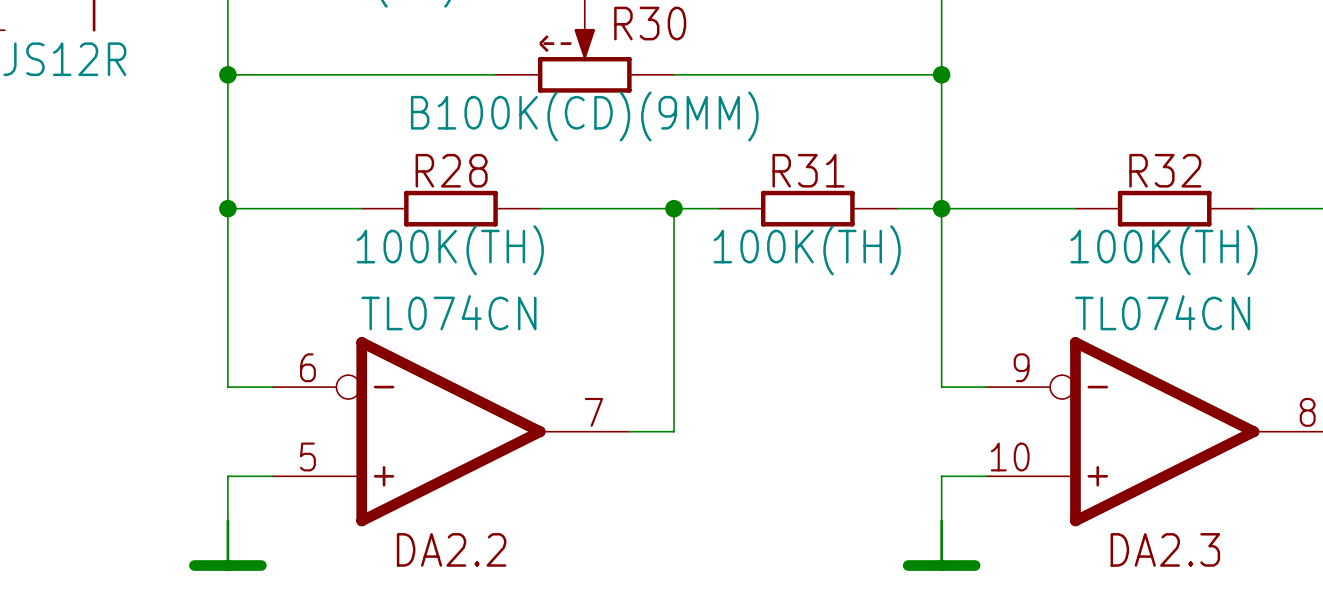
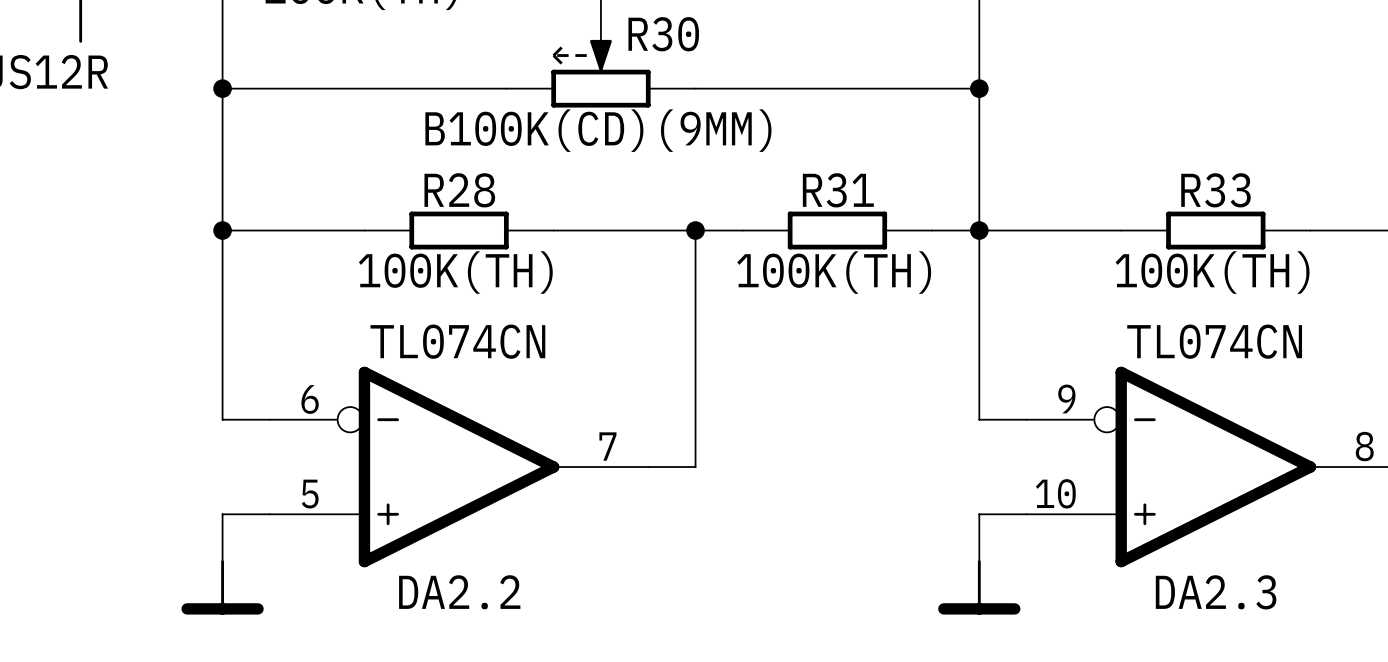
R32 name: R32 (1165, 170) -> R33 (1215, 190)

